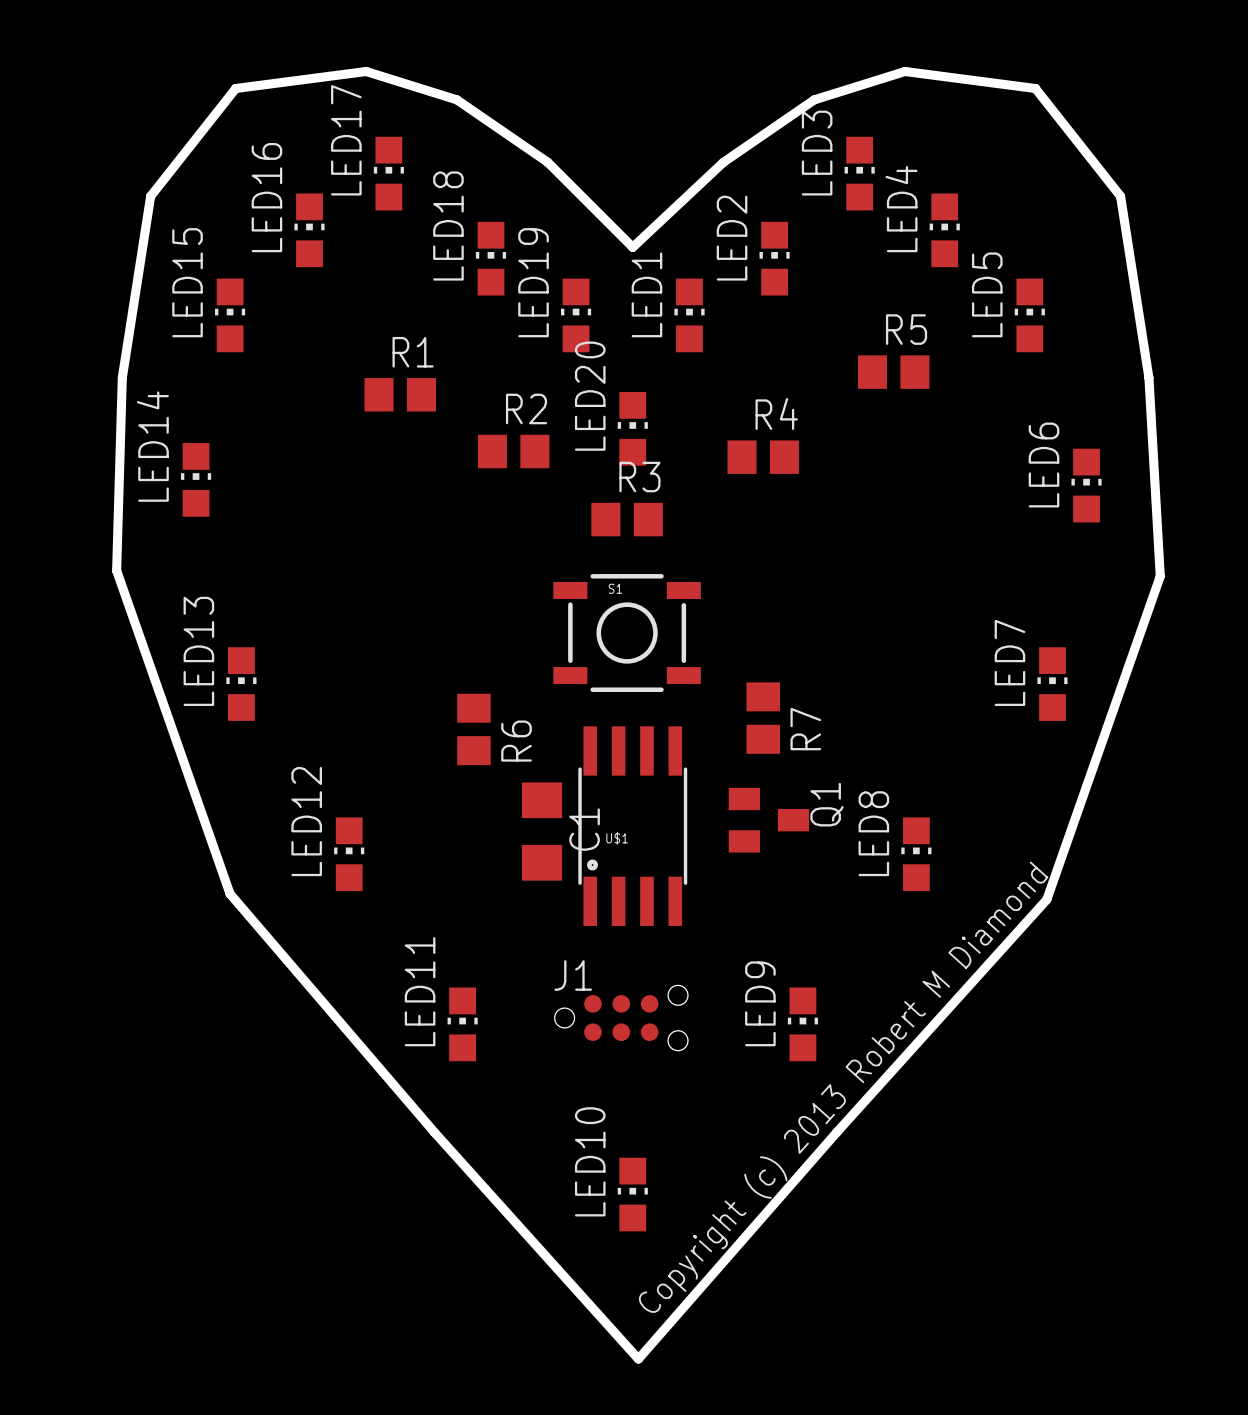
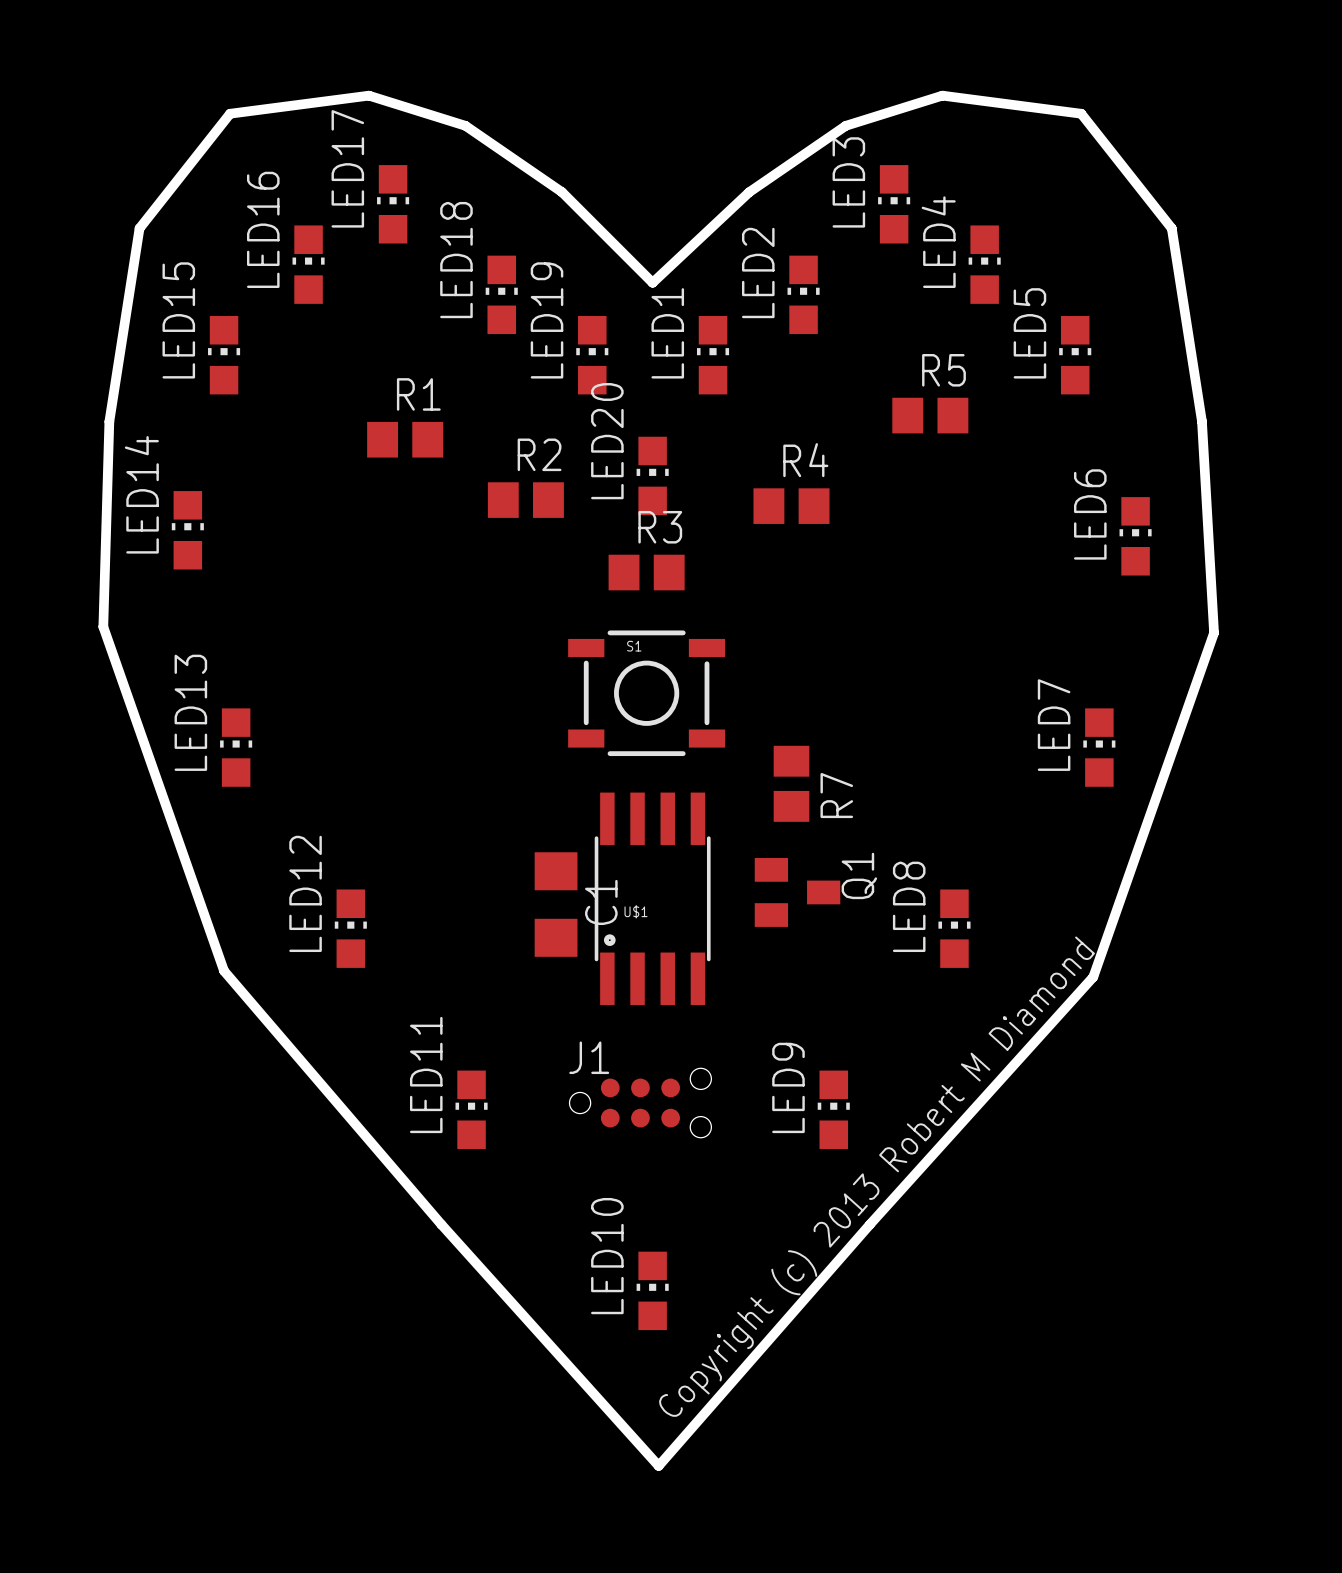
R6: (473, 729) -> none

